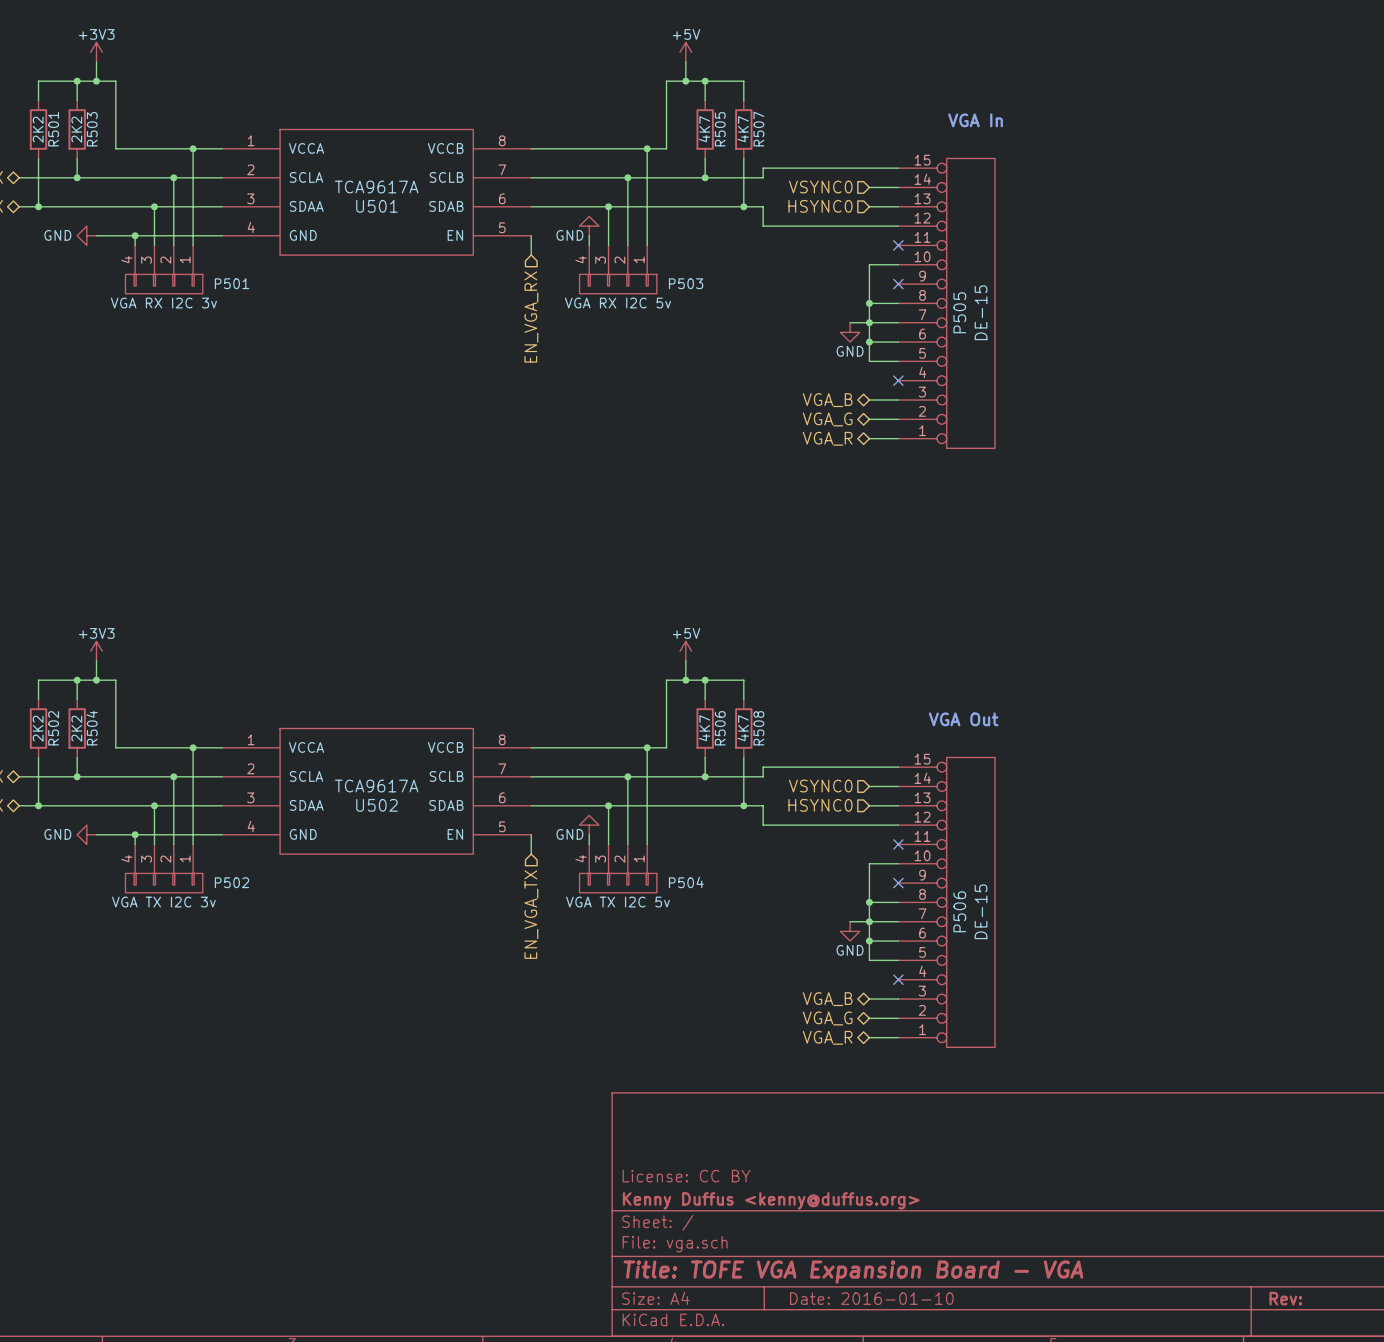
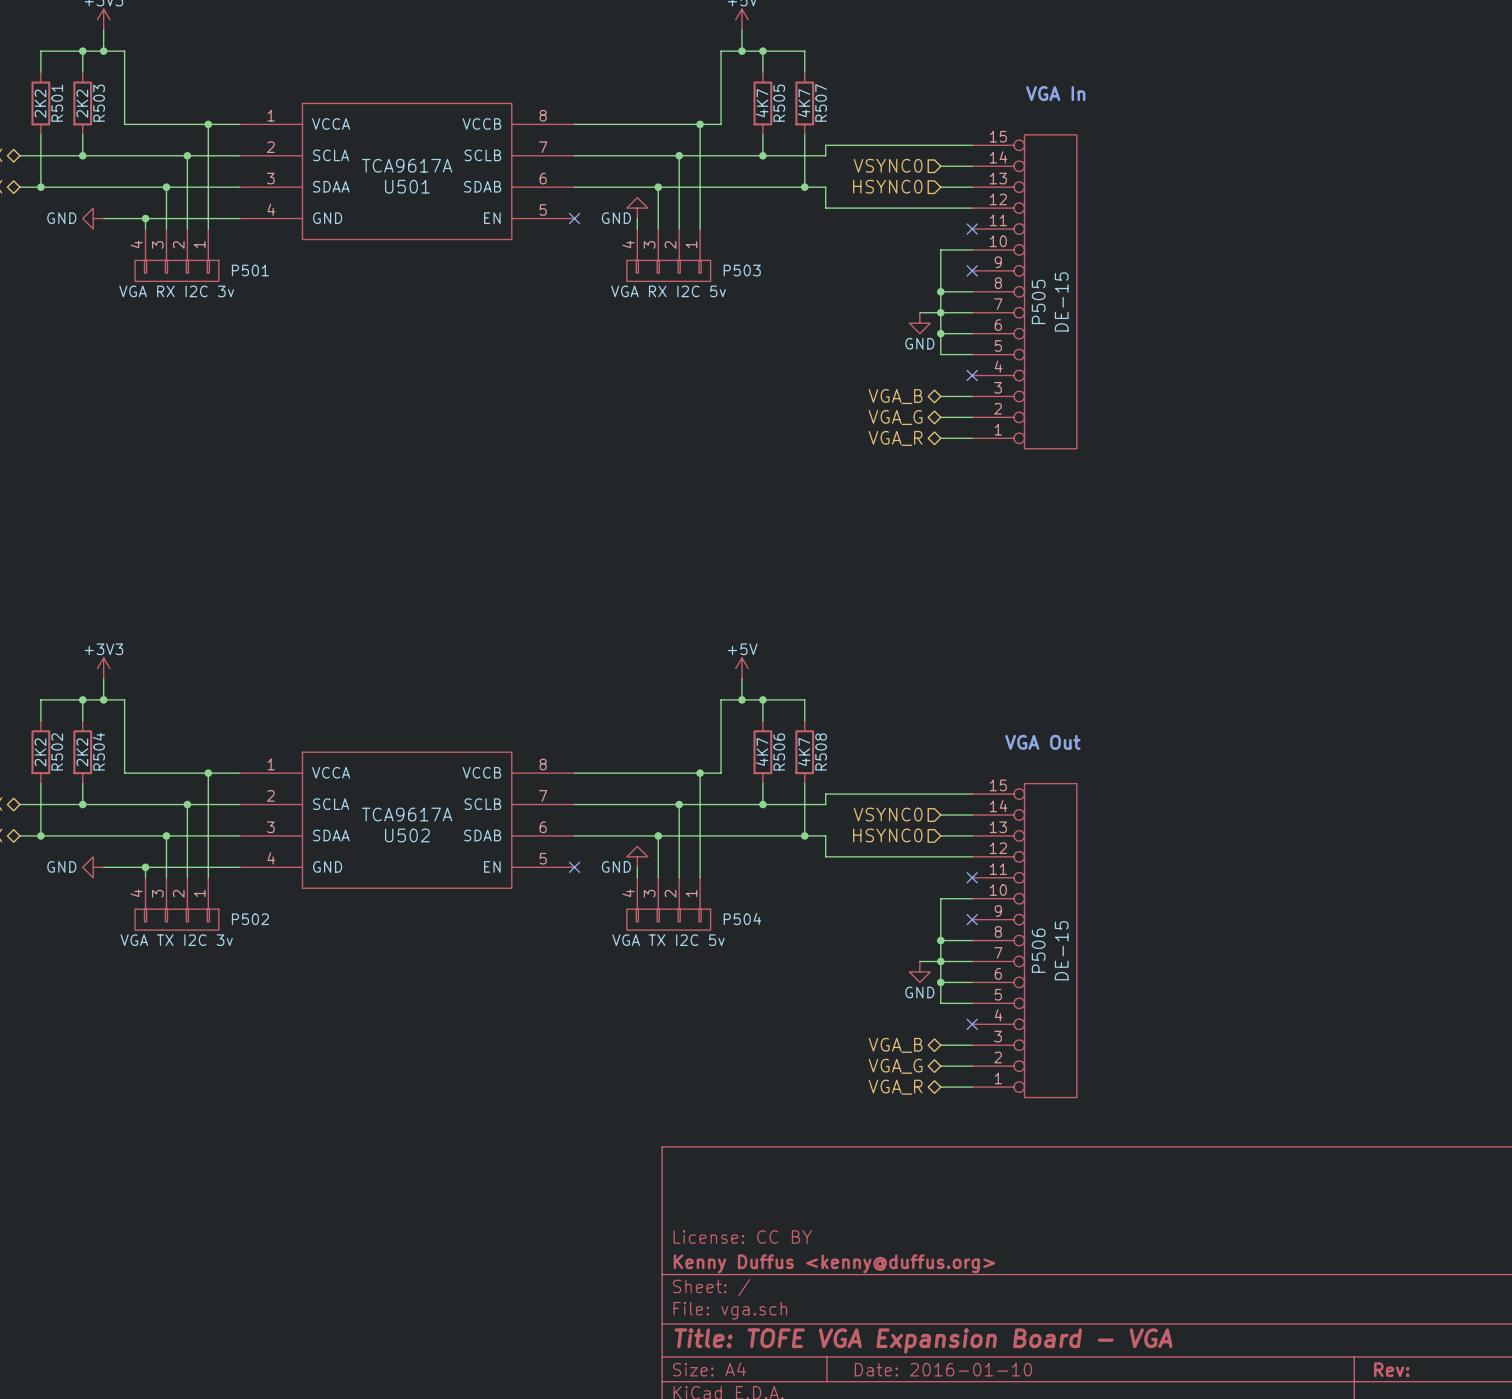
wire: (531, 235) (531, 255) -> none
no-connect mark: none -> (574, 218)
hierarchical label: EN_VGA_RX (531, 316) -> none
wire: (531, 834) (531, 854) -> none
no-connect mark: none -> (574, 867)
hierarchical label: EN_VGA_TX (531, 914) -> none

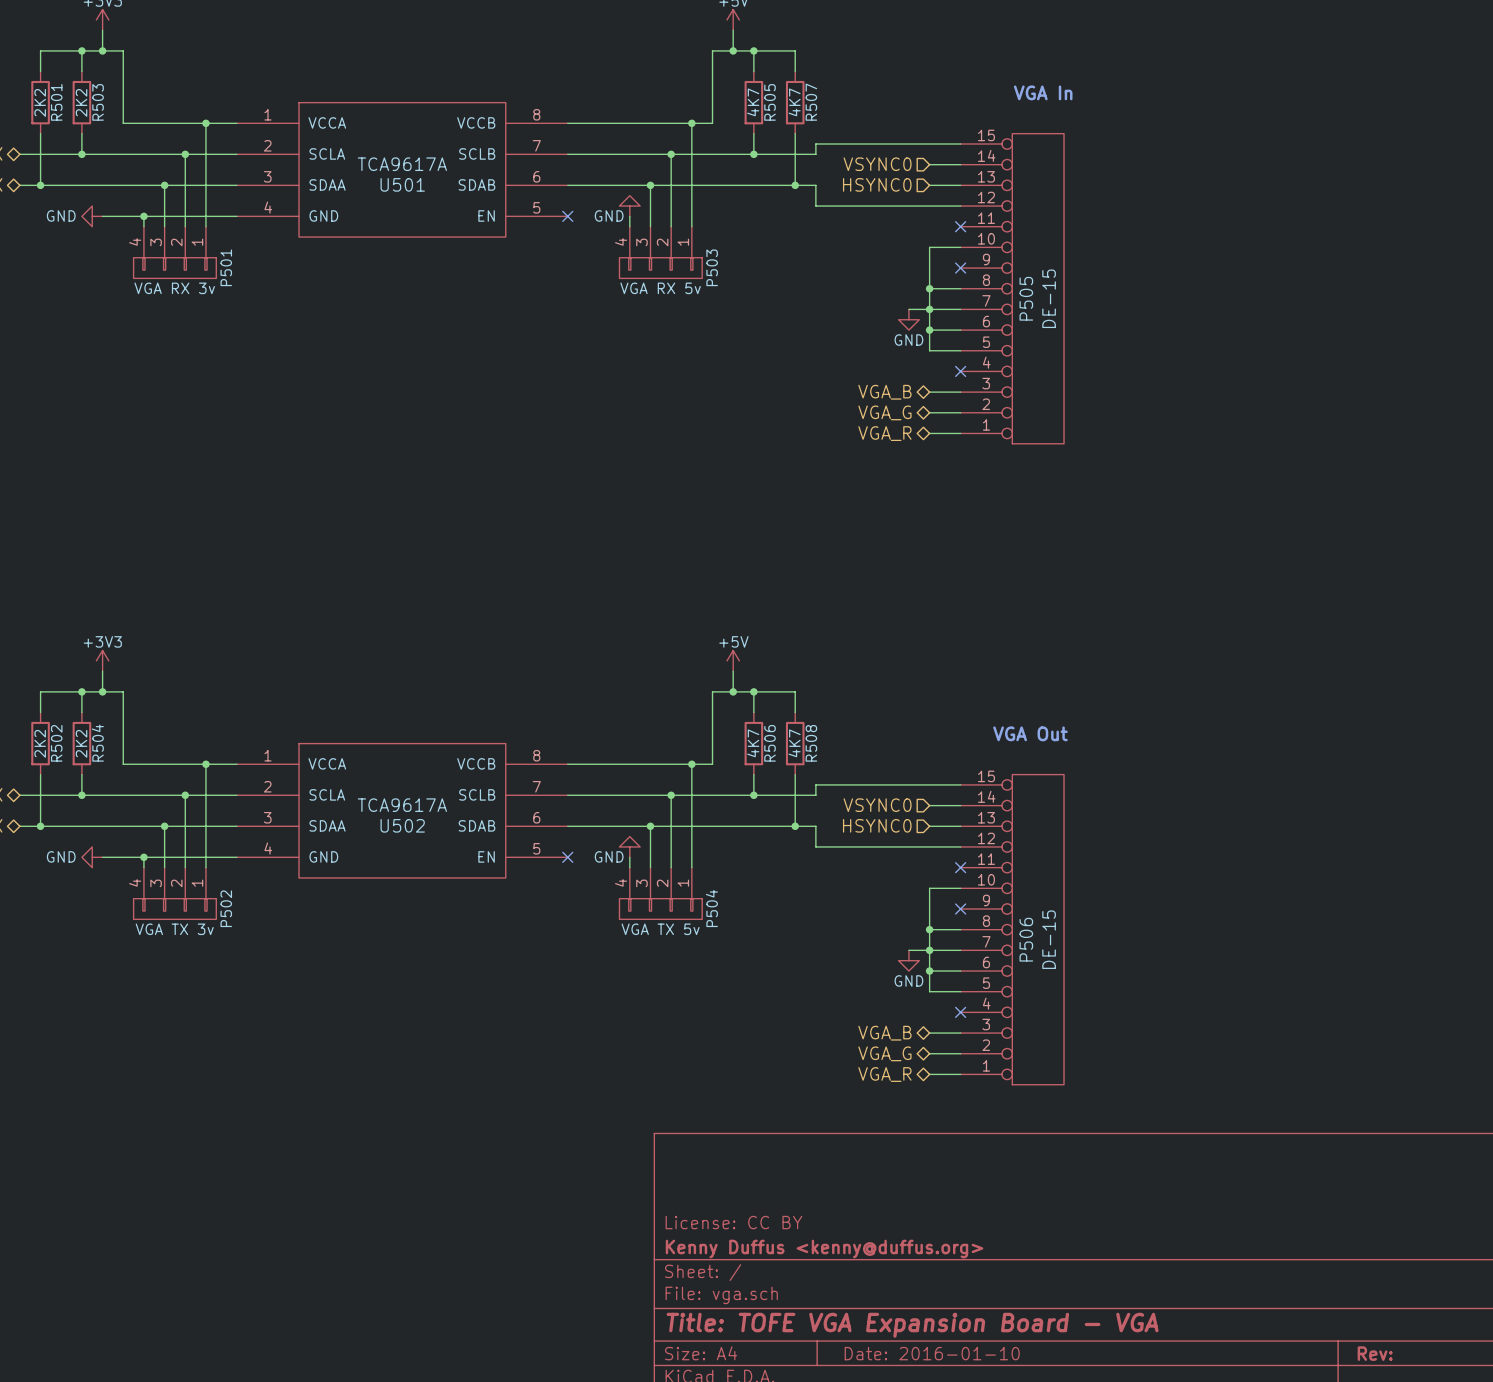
P501 name rotation: 0° (250, 270) -> 90° counterclockwise (226, 267)
P503 name rotation: 0° (742, 270) -> 90° counterclockwise (712, 267)
P501 value: VGA RX I2C 3v (176, 291) -> VGA RX 3v (174, 288)
P503 value: VGA RX I2C 5v (668, 291) -> VGA RX 5v (660, 288)
P502 name rotation: 0° (250, 919) -> 90° counterclockwise (226, 908)
P504 name rotation: 0° (742, 919) -> 90° counterclockwise (711, 908)
P502 value: VGA TX I2C 3v (176, 940) -> VGA TX 3v (174, 929)
P504 value: VGA TX I2C 5v (668, 940) -> VGA TX 5v (660, 929)

